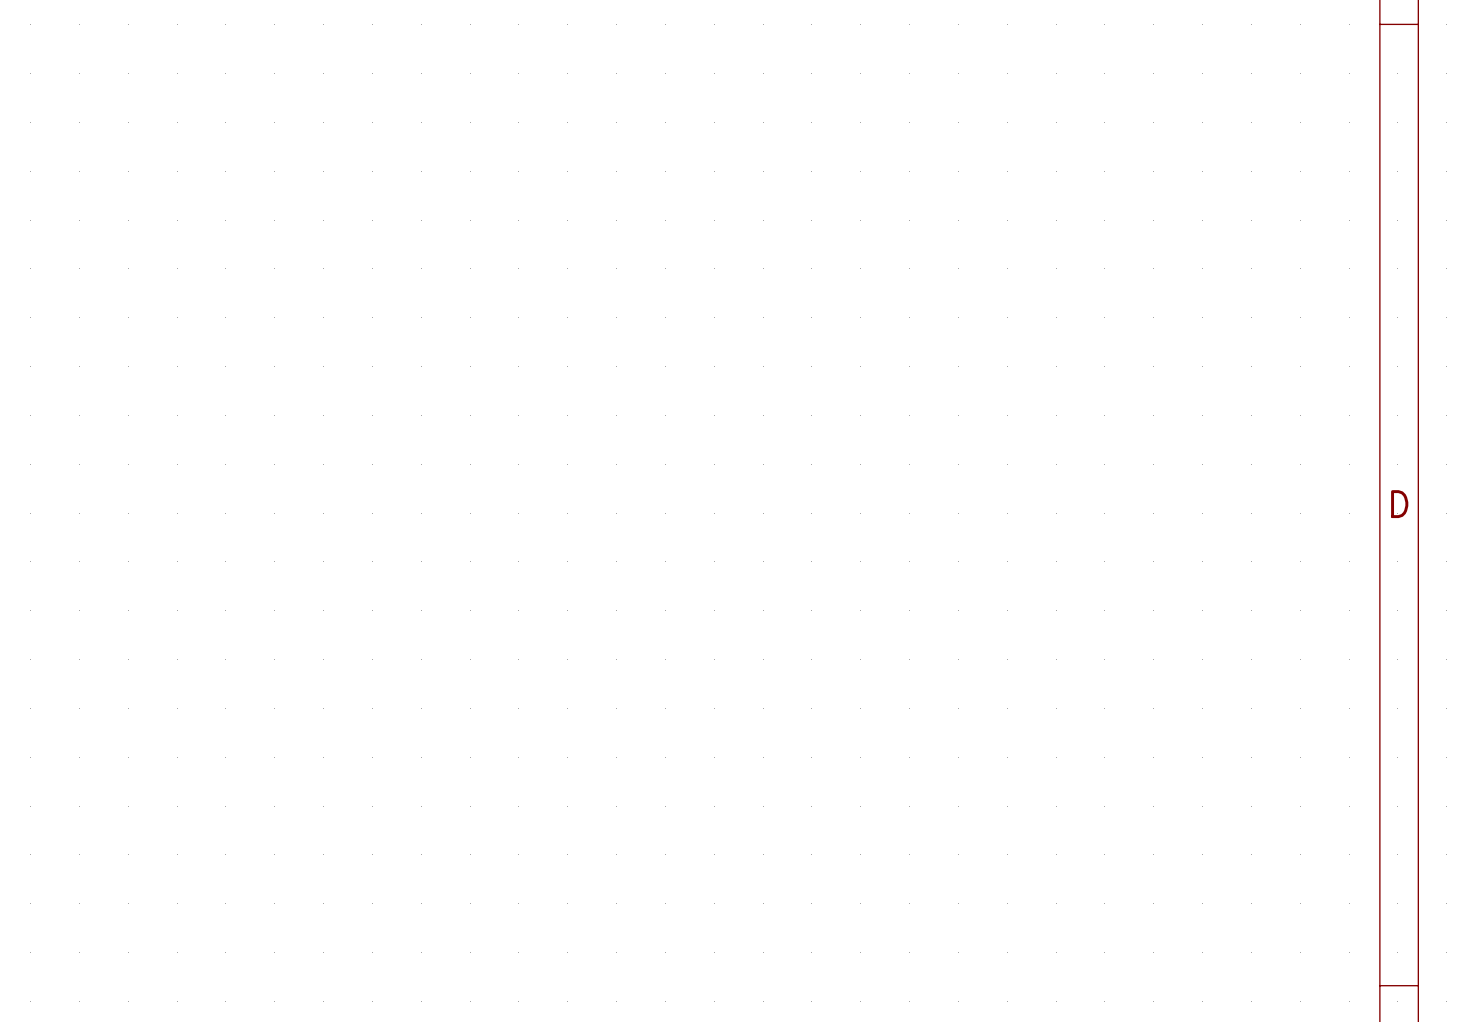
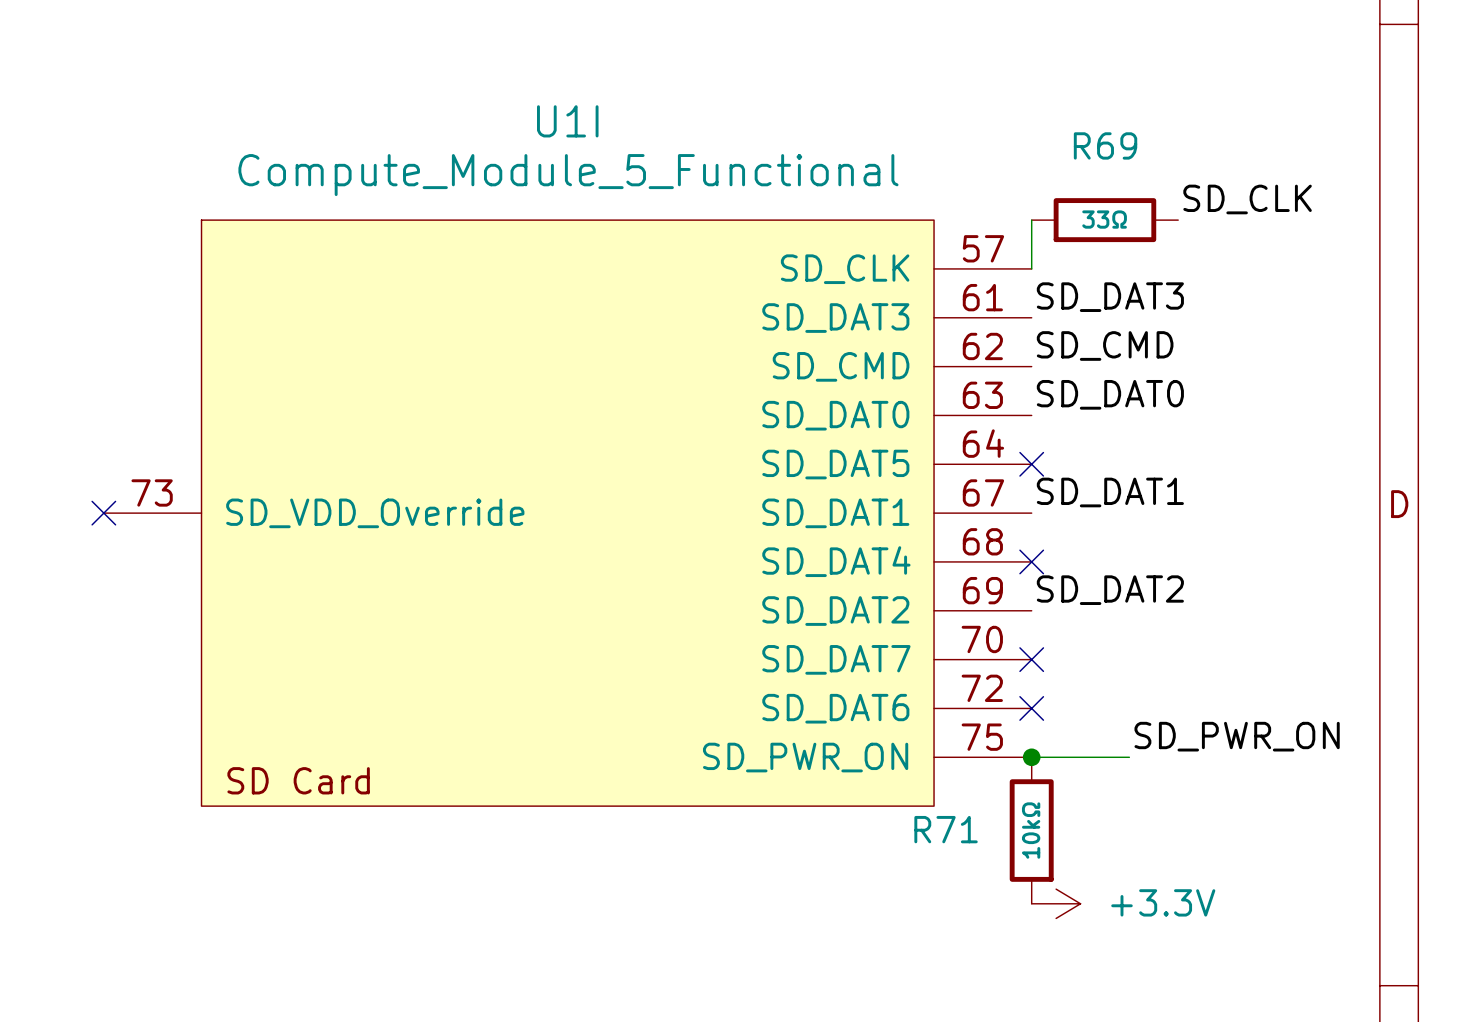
label: none -> SD_CLK (1247, 199)
wire: none -> (1031, 220) (1031, 268)
R69: none -> 33Ω (1104, 220)
label: none -> SD_DAT3 (1110, 297)
label: none -> SD_CMD (1105, 345)
label: none -> SD_DAT0 (1110, 394)
no-connect mark: none -> (1031, 464)
label: none -> SD_DAT1 (1110, 492)
no-connect mark: none -> (103, 513)
U1I: none -> Compute_Module_5_Functional (567, 513)
no-connect mark: none -> (1031, 561)
label: none -> SD_DAT2 (1110, 590)
no-connect mark: none -> (1031, 659)
no-connect mark: none -> (1031, 708)
label: none -> SD_PWR_ON (1237, 736)
wire: none -> (1031, 757) (1129, 757)
junction: none -> (1031, 757)
R71: none -> 10kΩ (1031, 830)
power symbol: none -> +3.3V (1056, 903)

